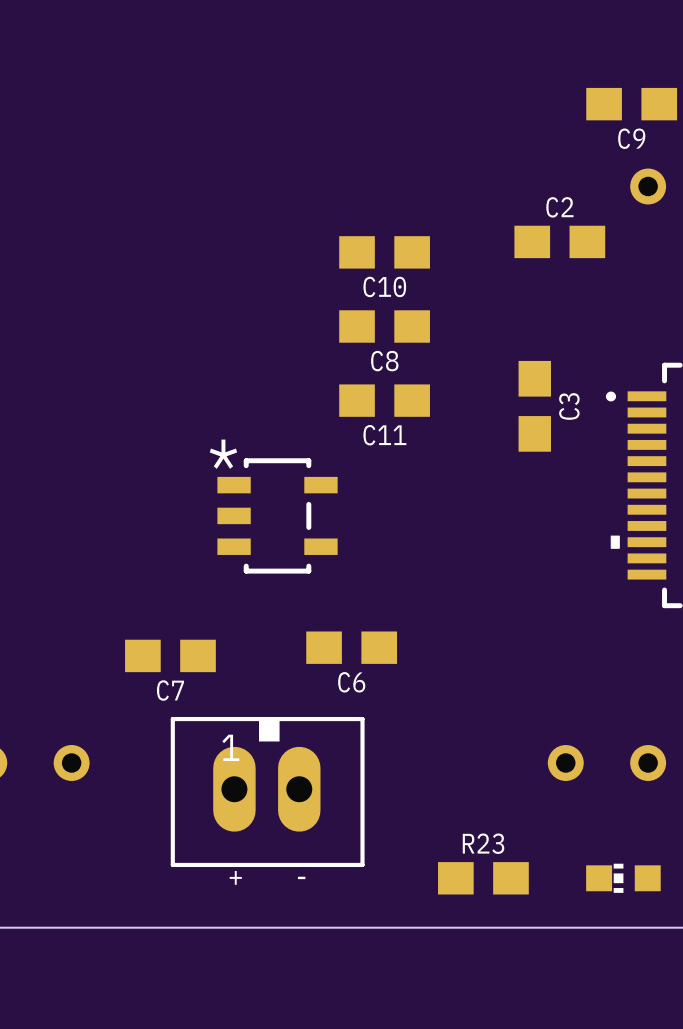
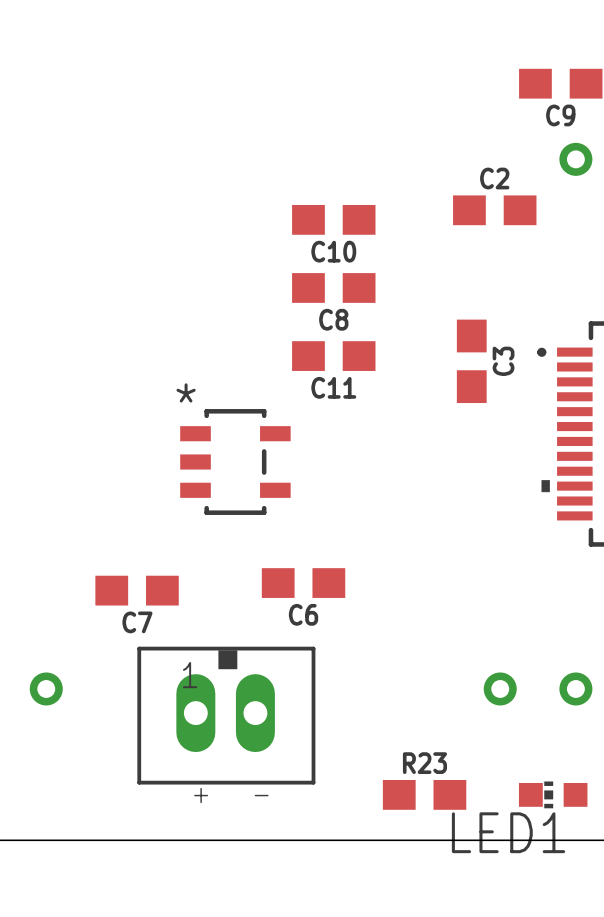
LED1 name: none -> LED1 (508, 832)

